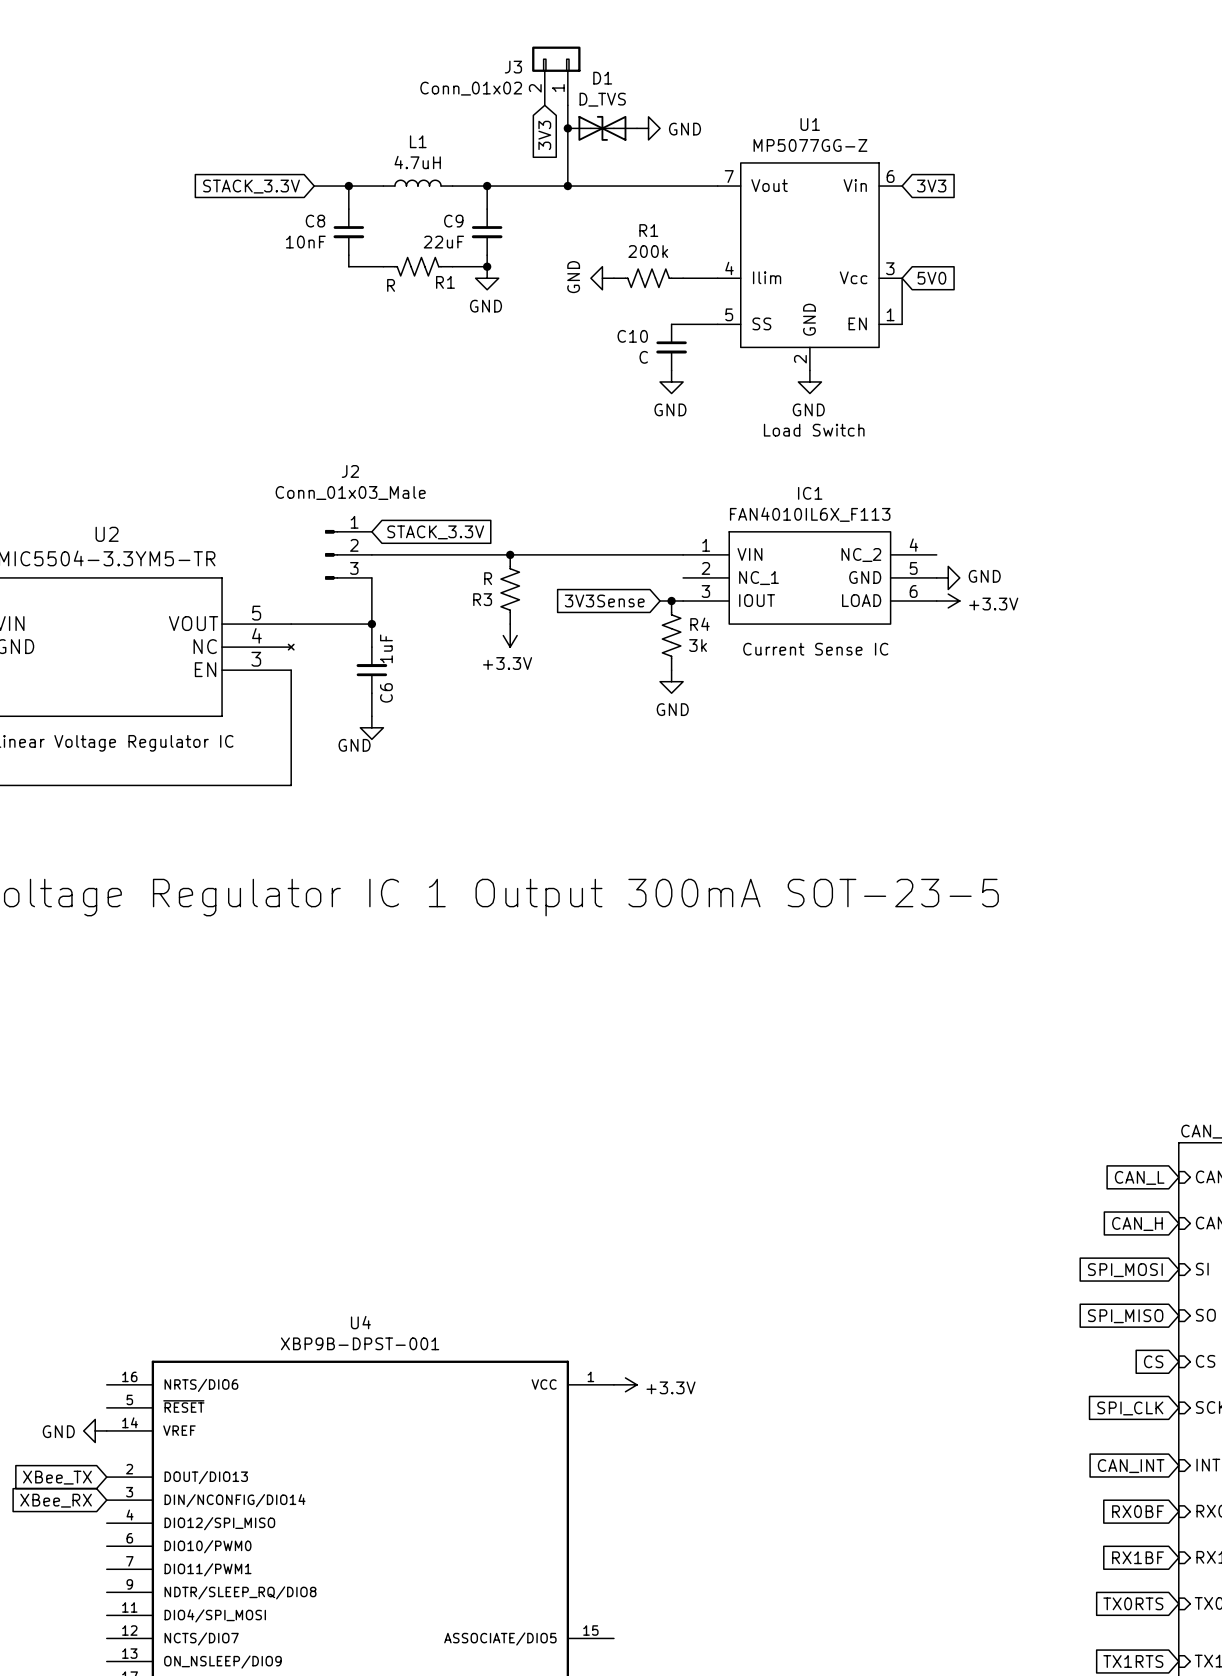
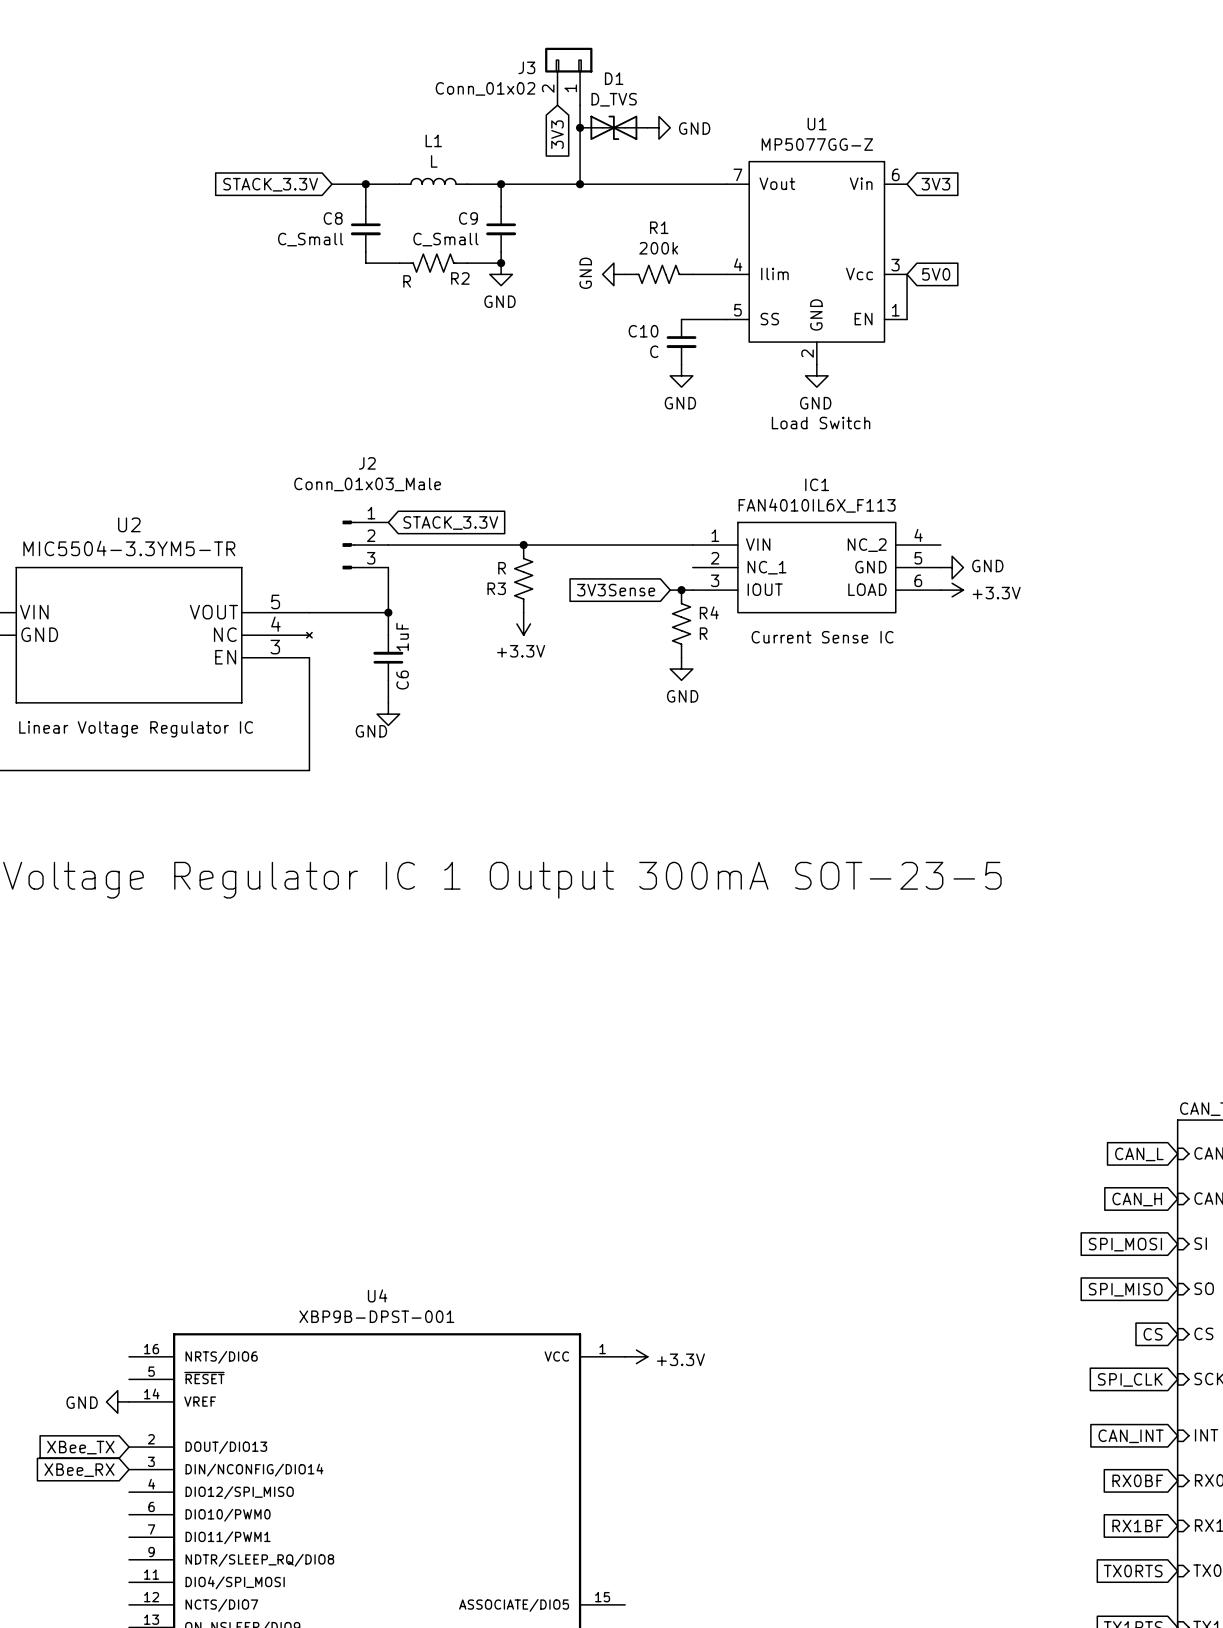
L1 value: 4.7uH (417, 162) -> L (434, 161)
C8 value: 10nF (305, 242) -> C_Small (310, 239)
C9 value: 22uF (443, 242) -> C_Small (445, 239)
R1 name: R1 (445, 282) -> R2 (460, 278)
R4 value: 3k (698, 645) -> R (703, 633)

